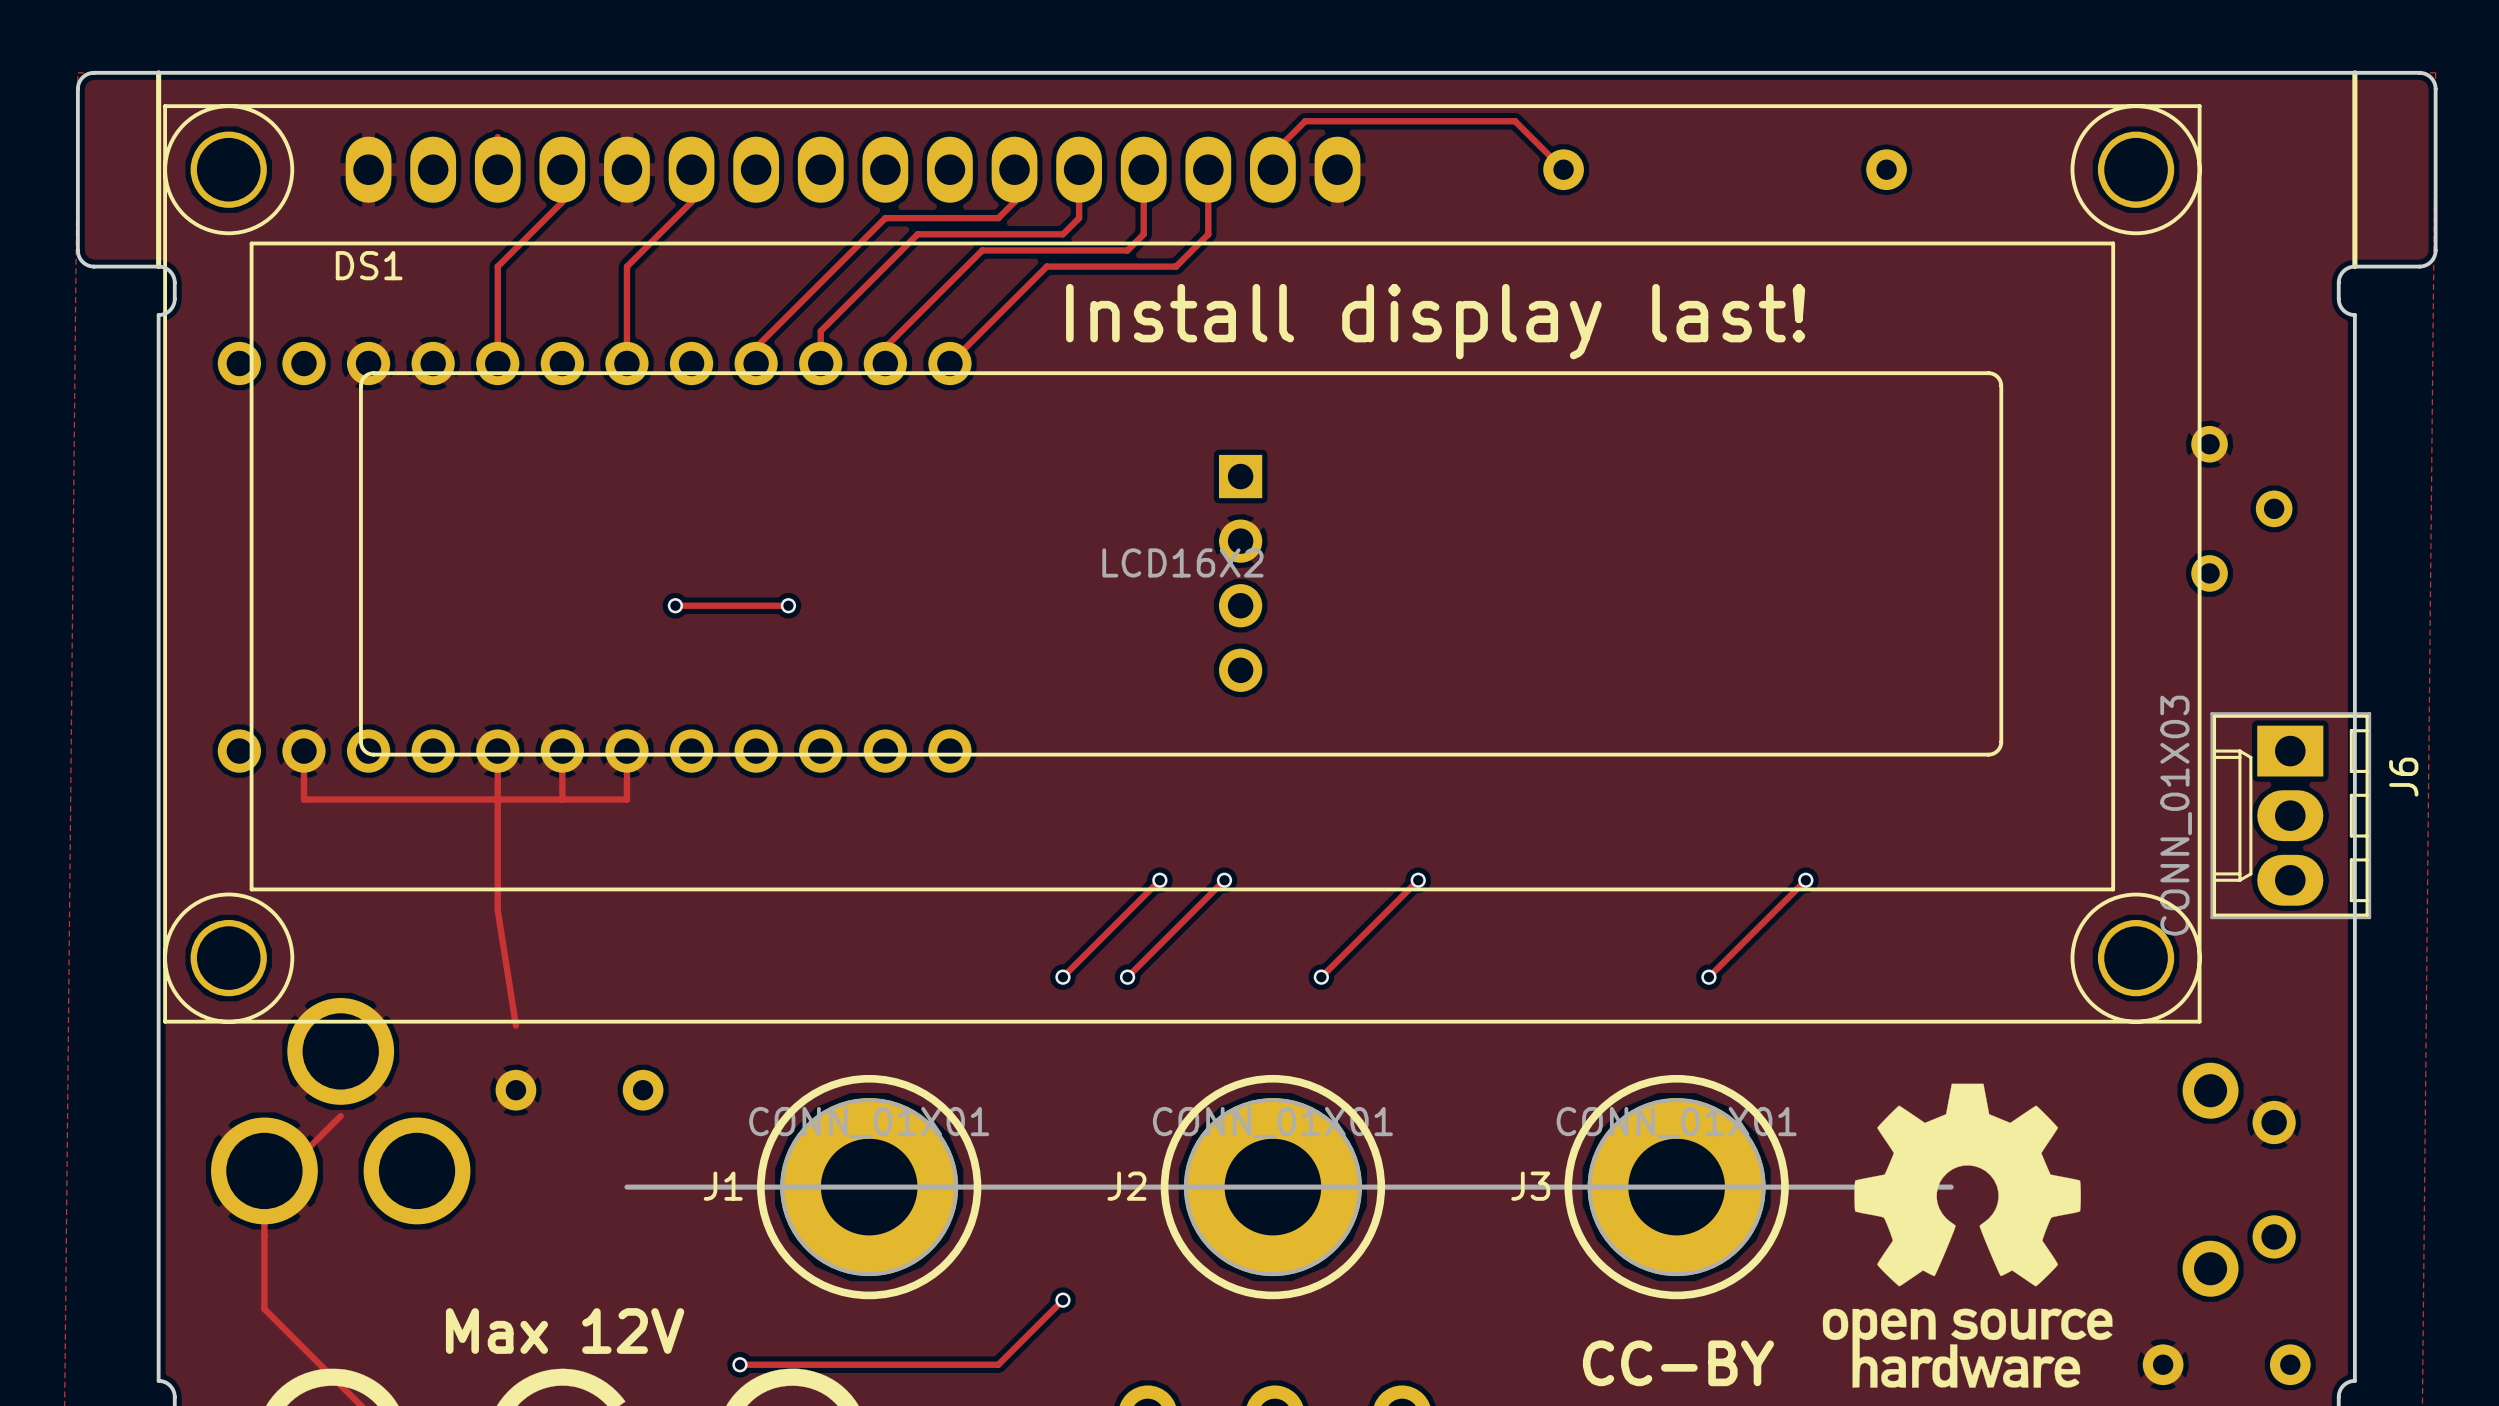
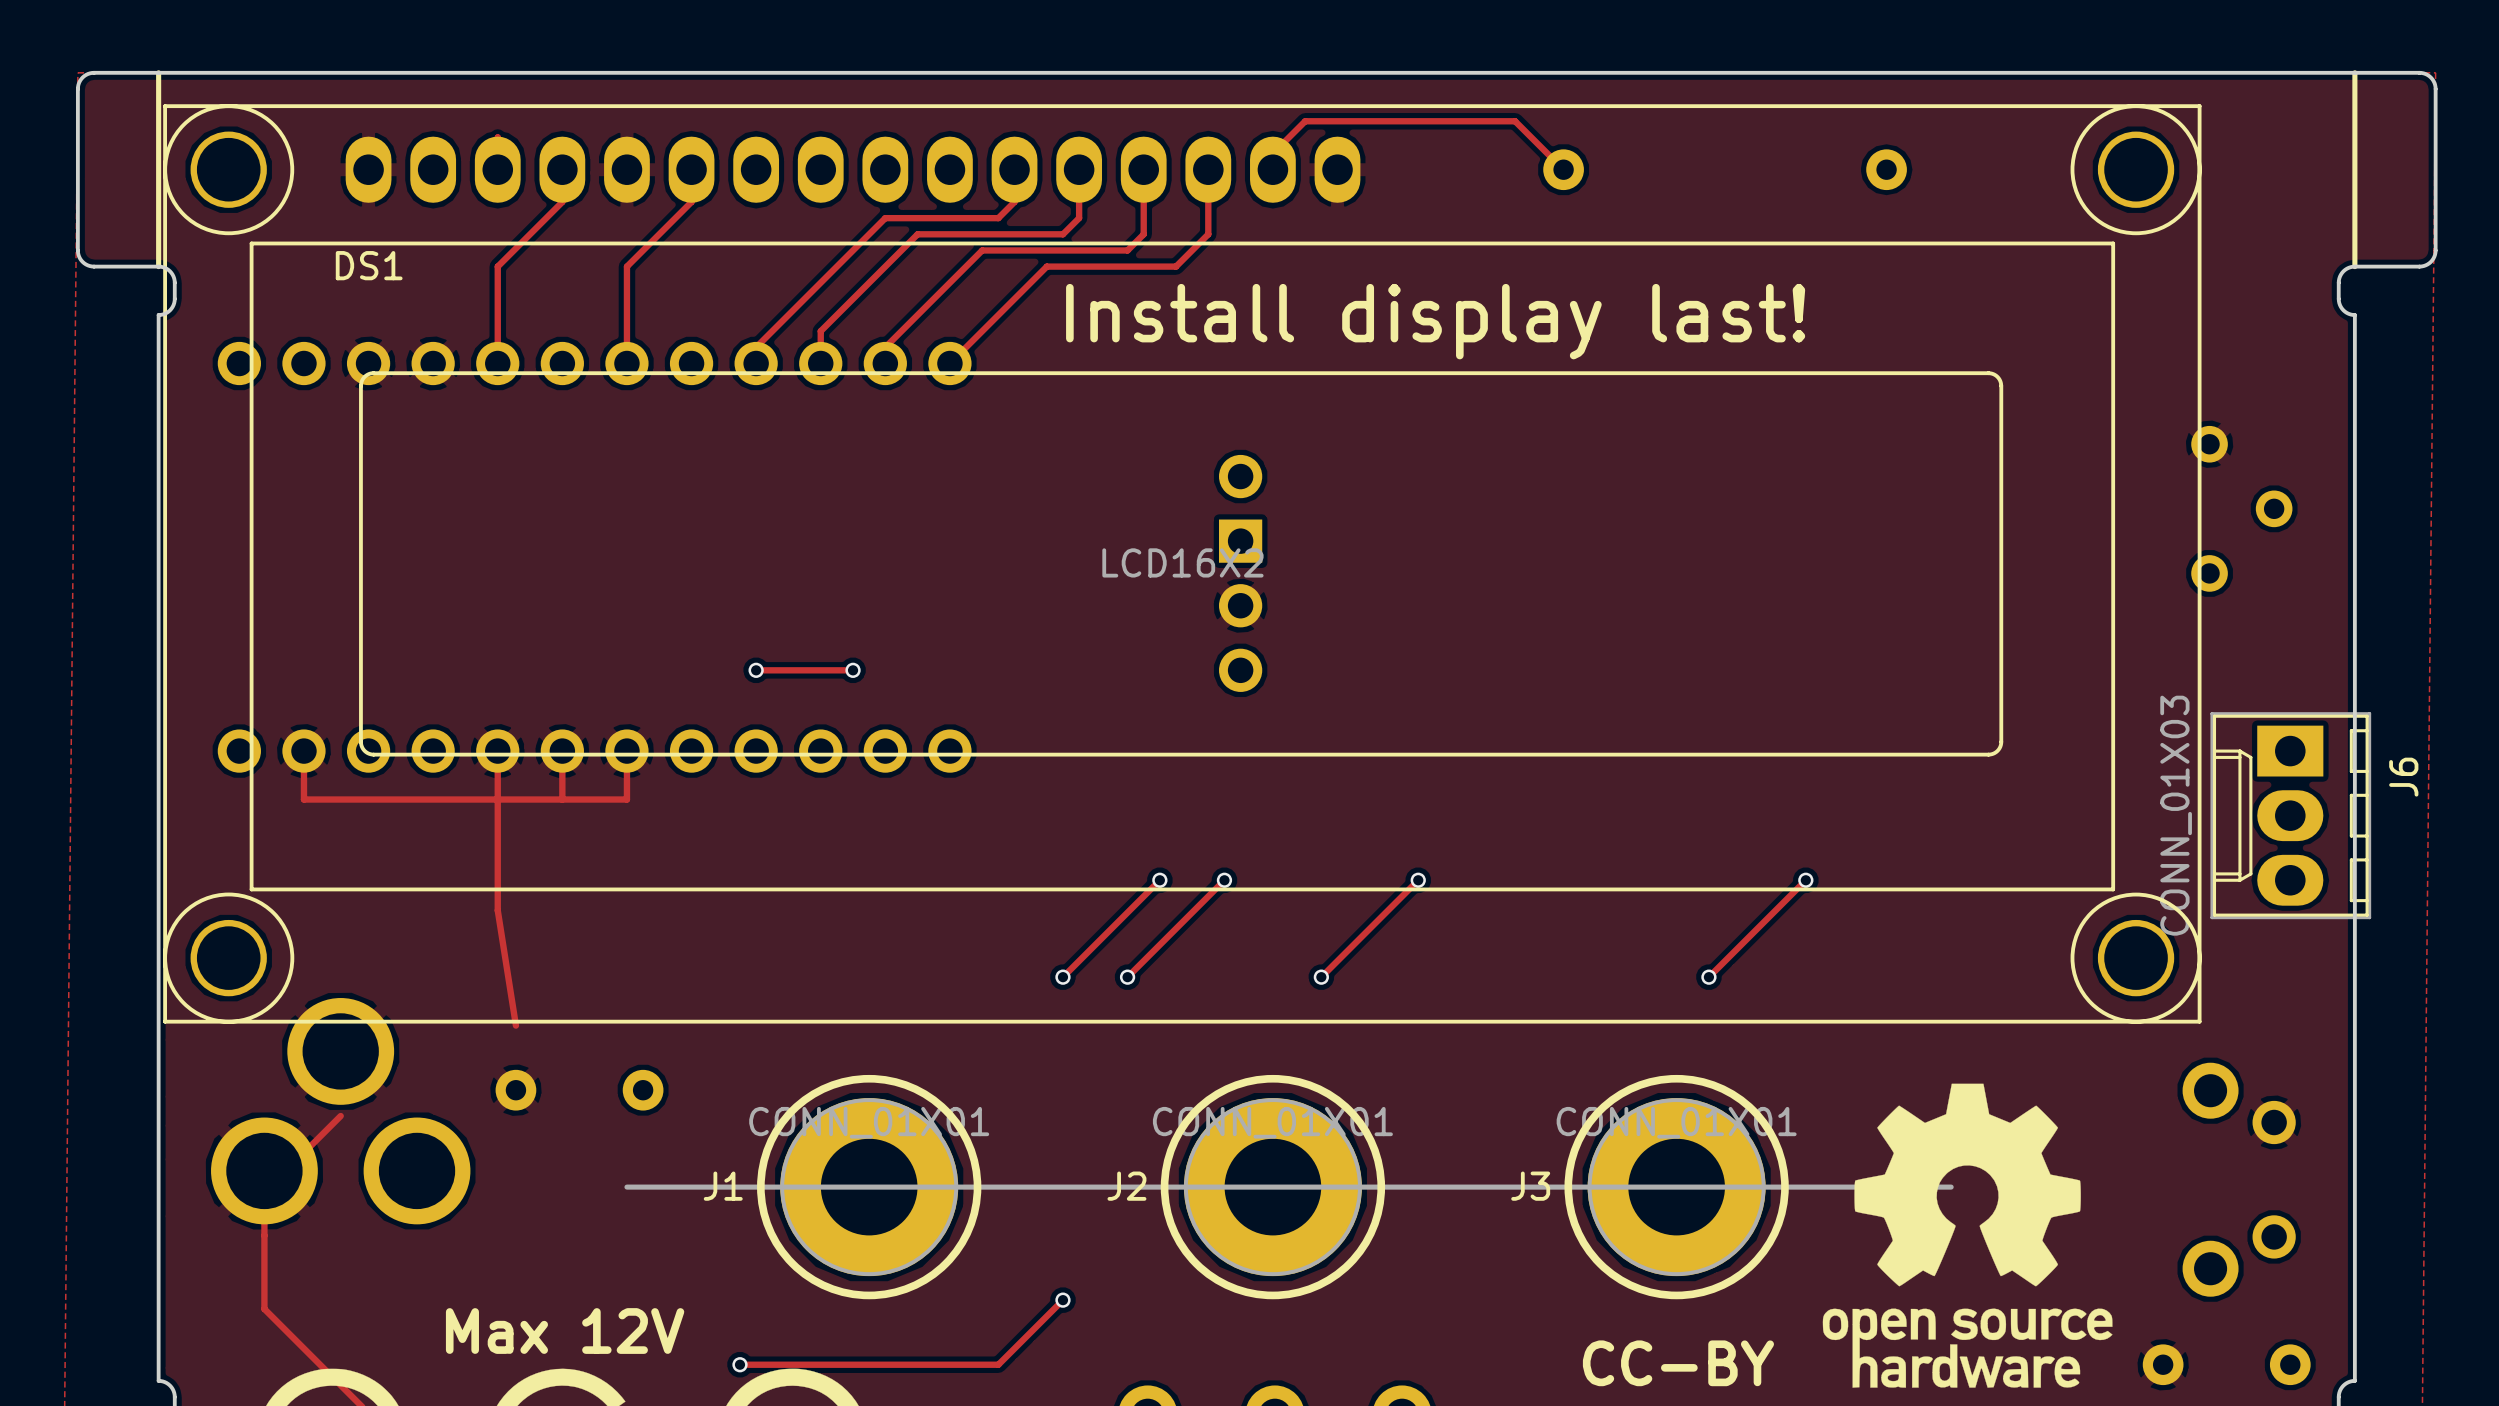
part footprint: [1218, 454, 1263, 692] -> [1218, 454, 1263, 692]
track: (675, 605) (788, 605) -> none
via: (675, 605) -> none
via: (788, 605) -> none
track: none -> (756, 670) (853, 670)
via: none -> (756, 670)
via: none -> (853, 670)

